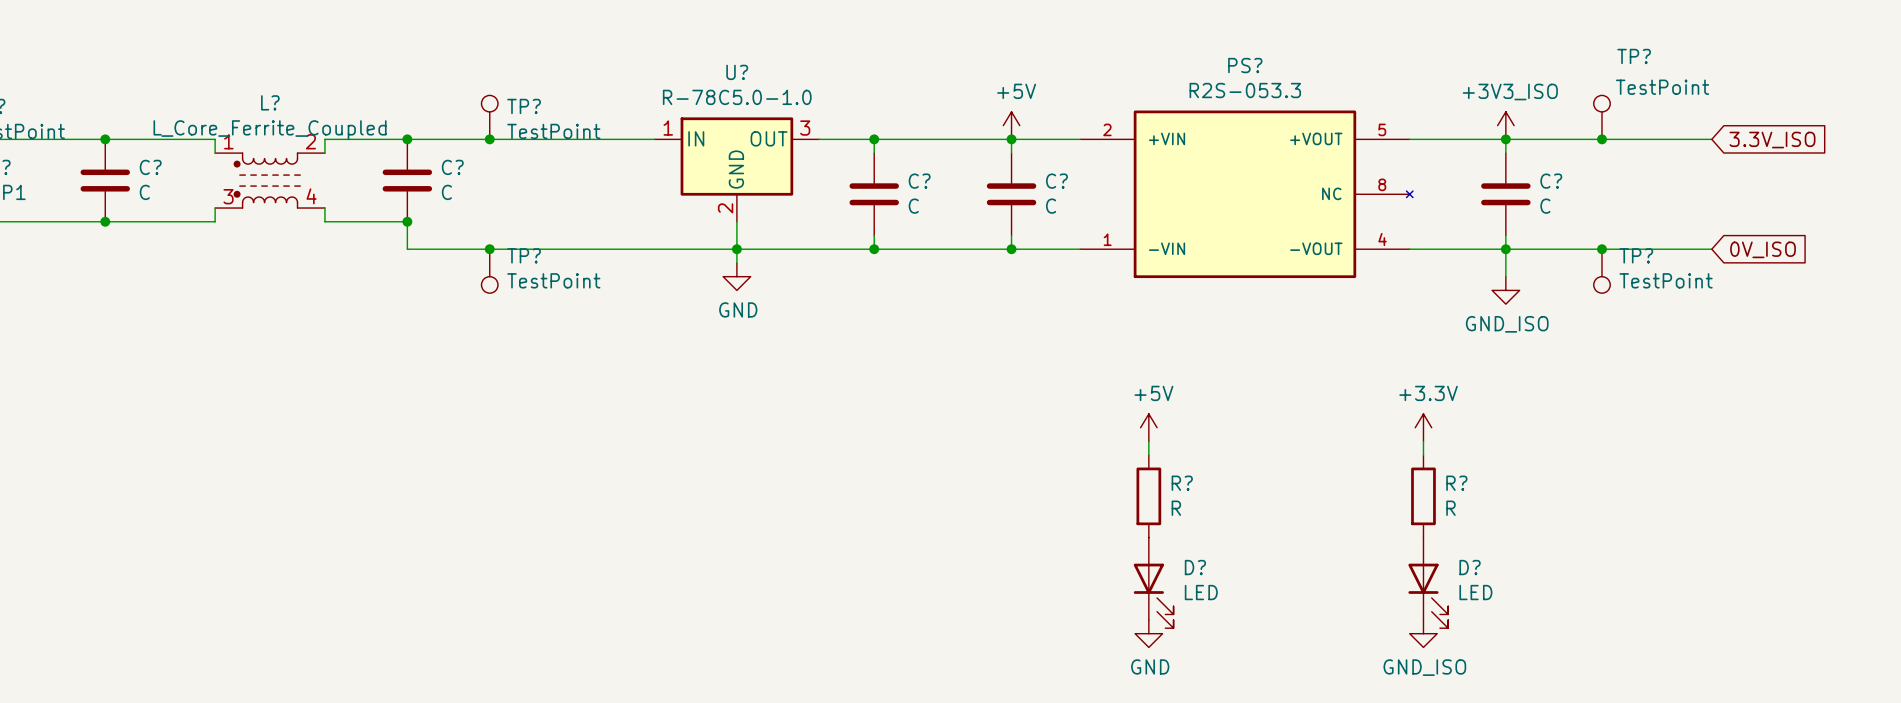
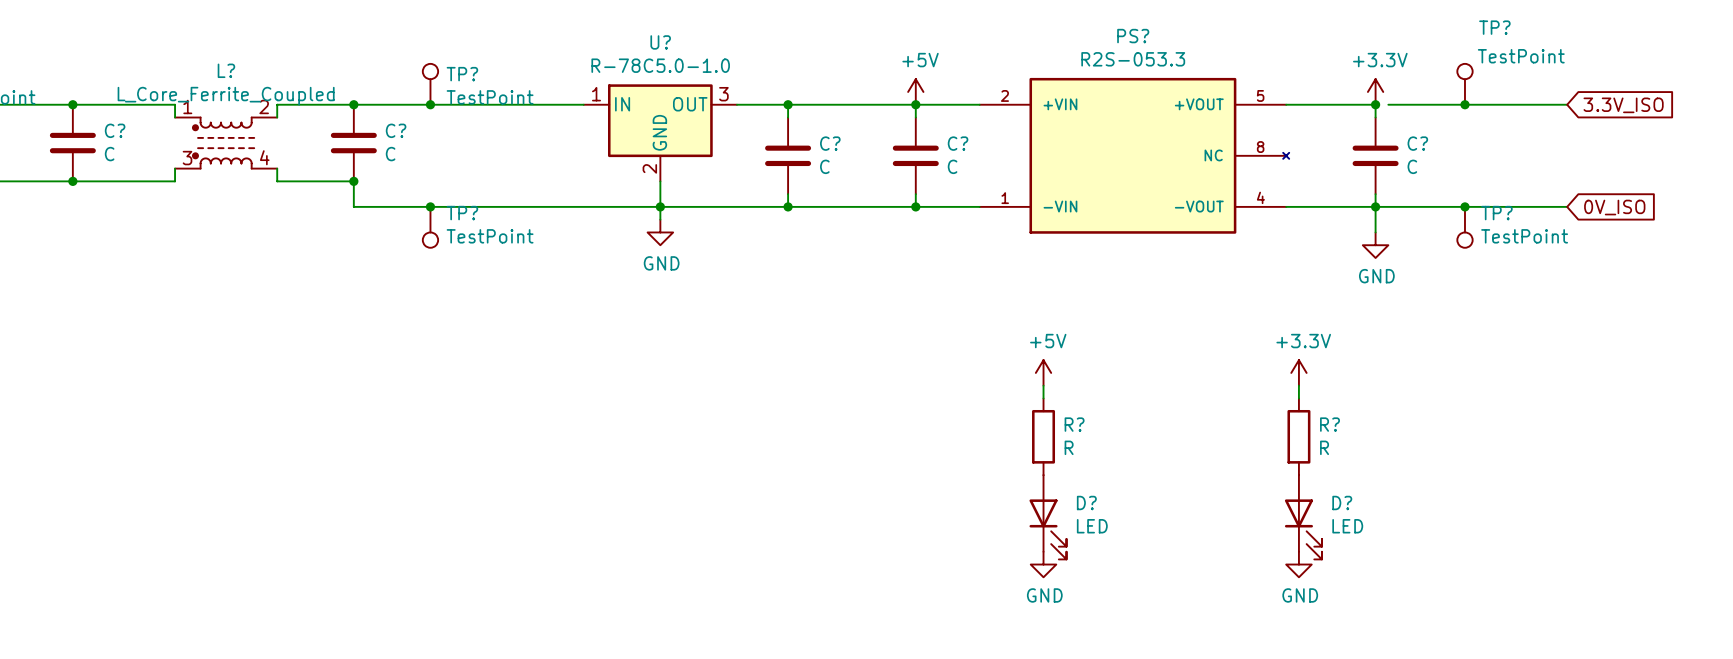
power symbol: +3V3_ISO (1505, 125) -> +3.3V (1375, 91)
wire: (1505, 139) (1519, 139) -> none
power symbol: GND_ISO (1505, 290) -> GND (1375, 245)
power symbol: GND_ISO (1423, 633) -> GND (1298, 564)

